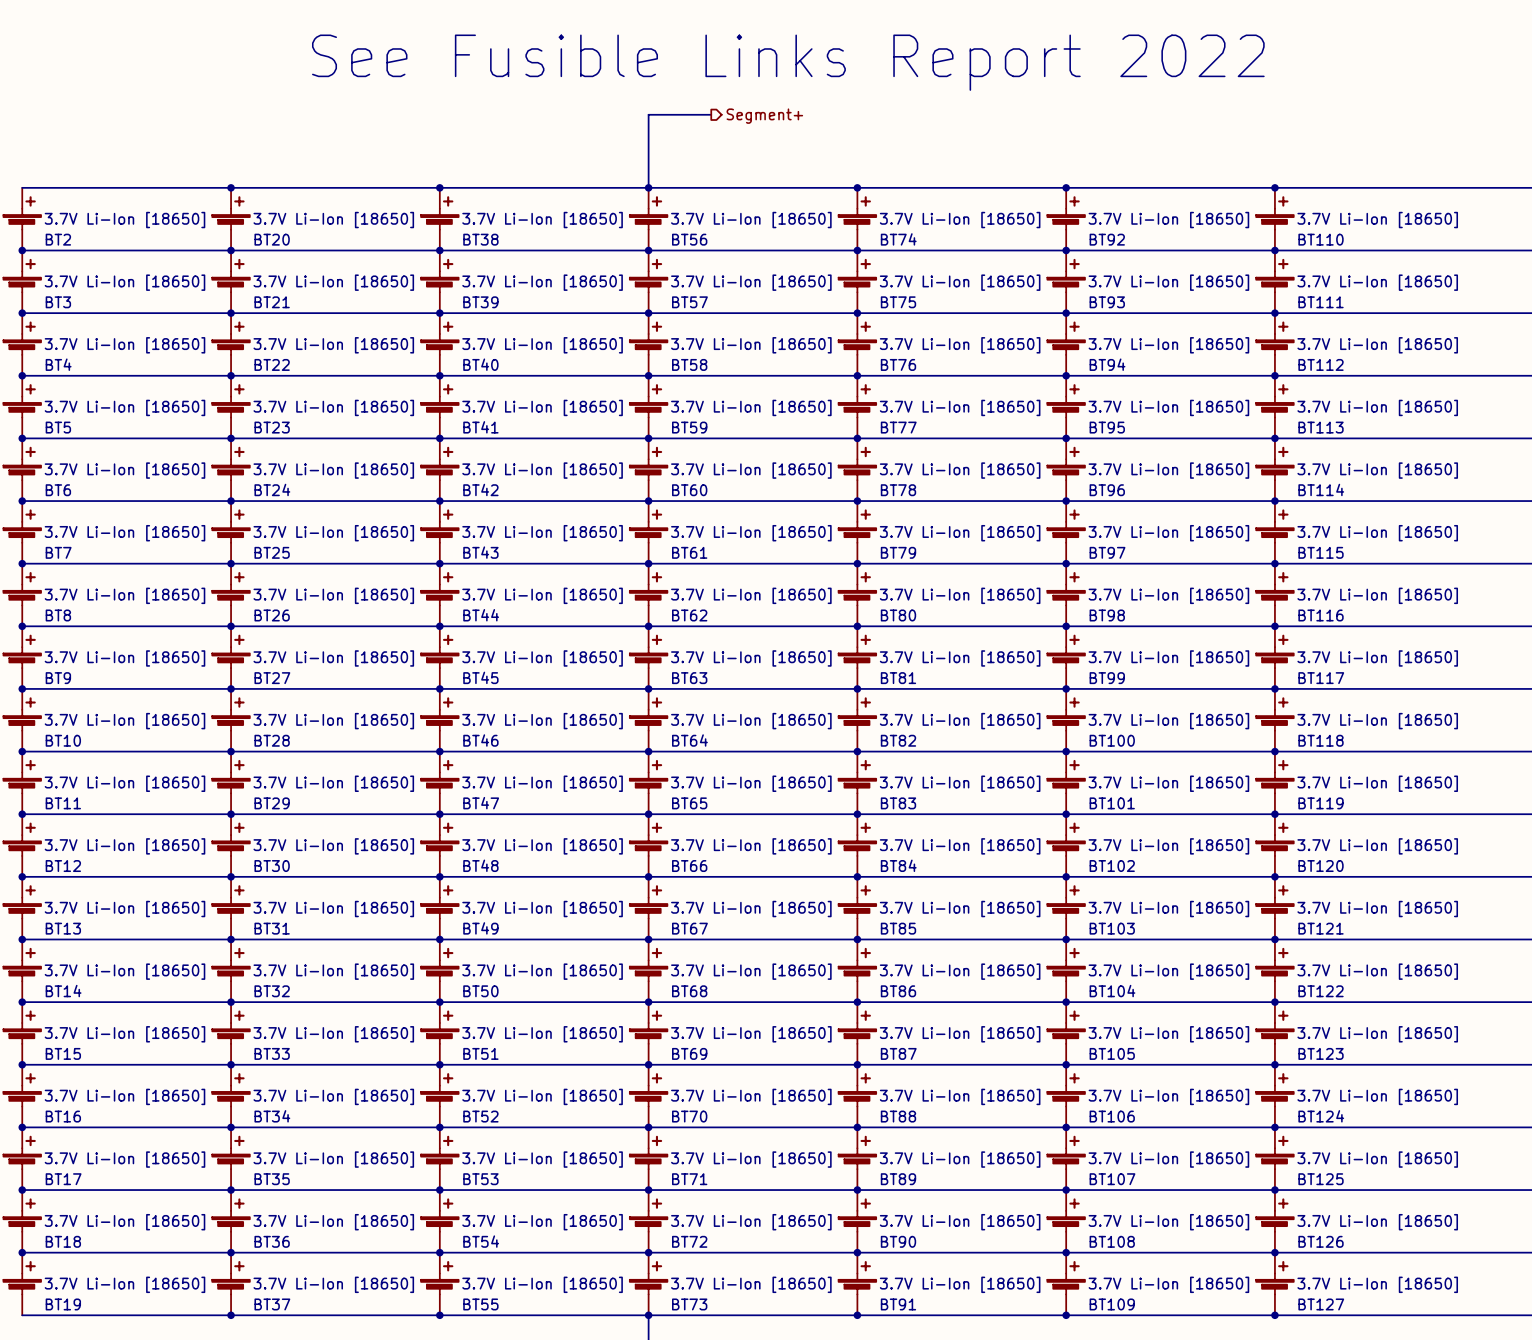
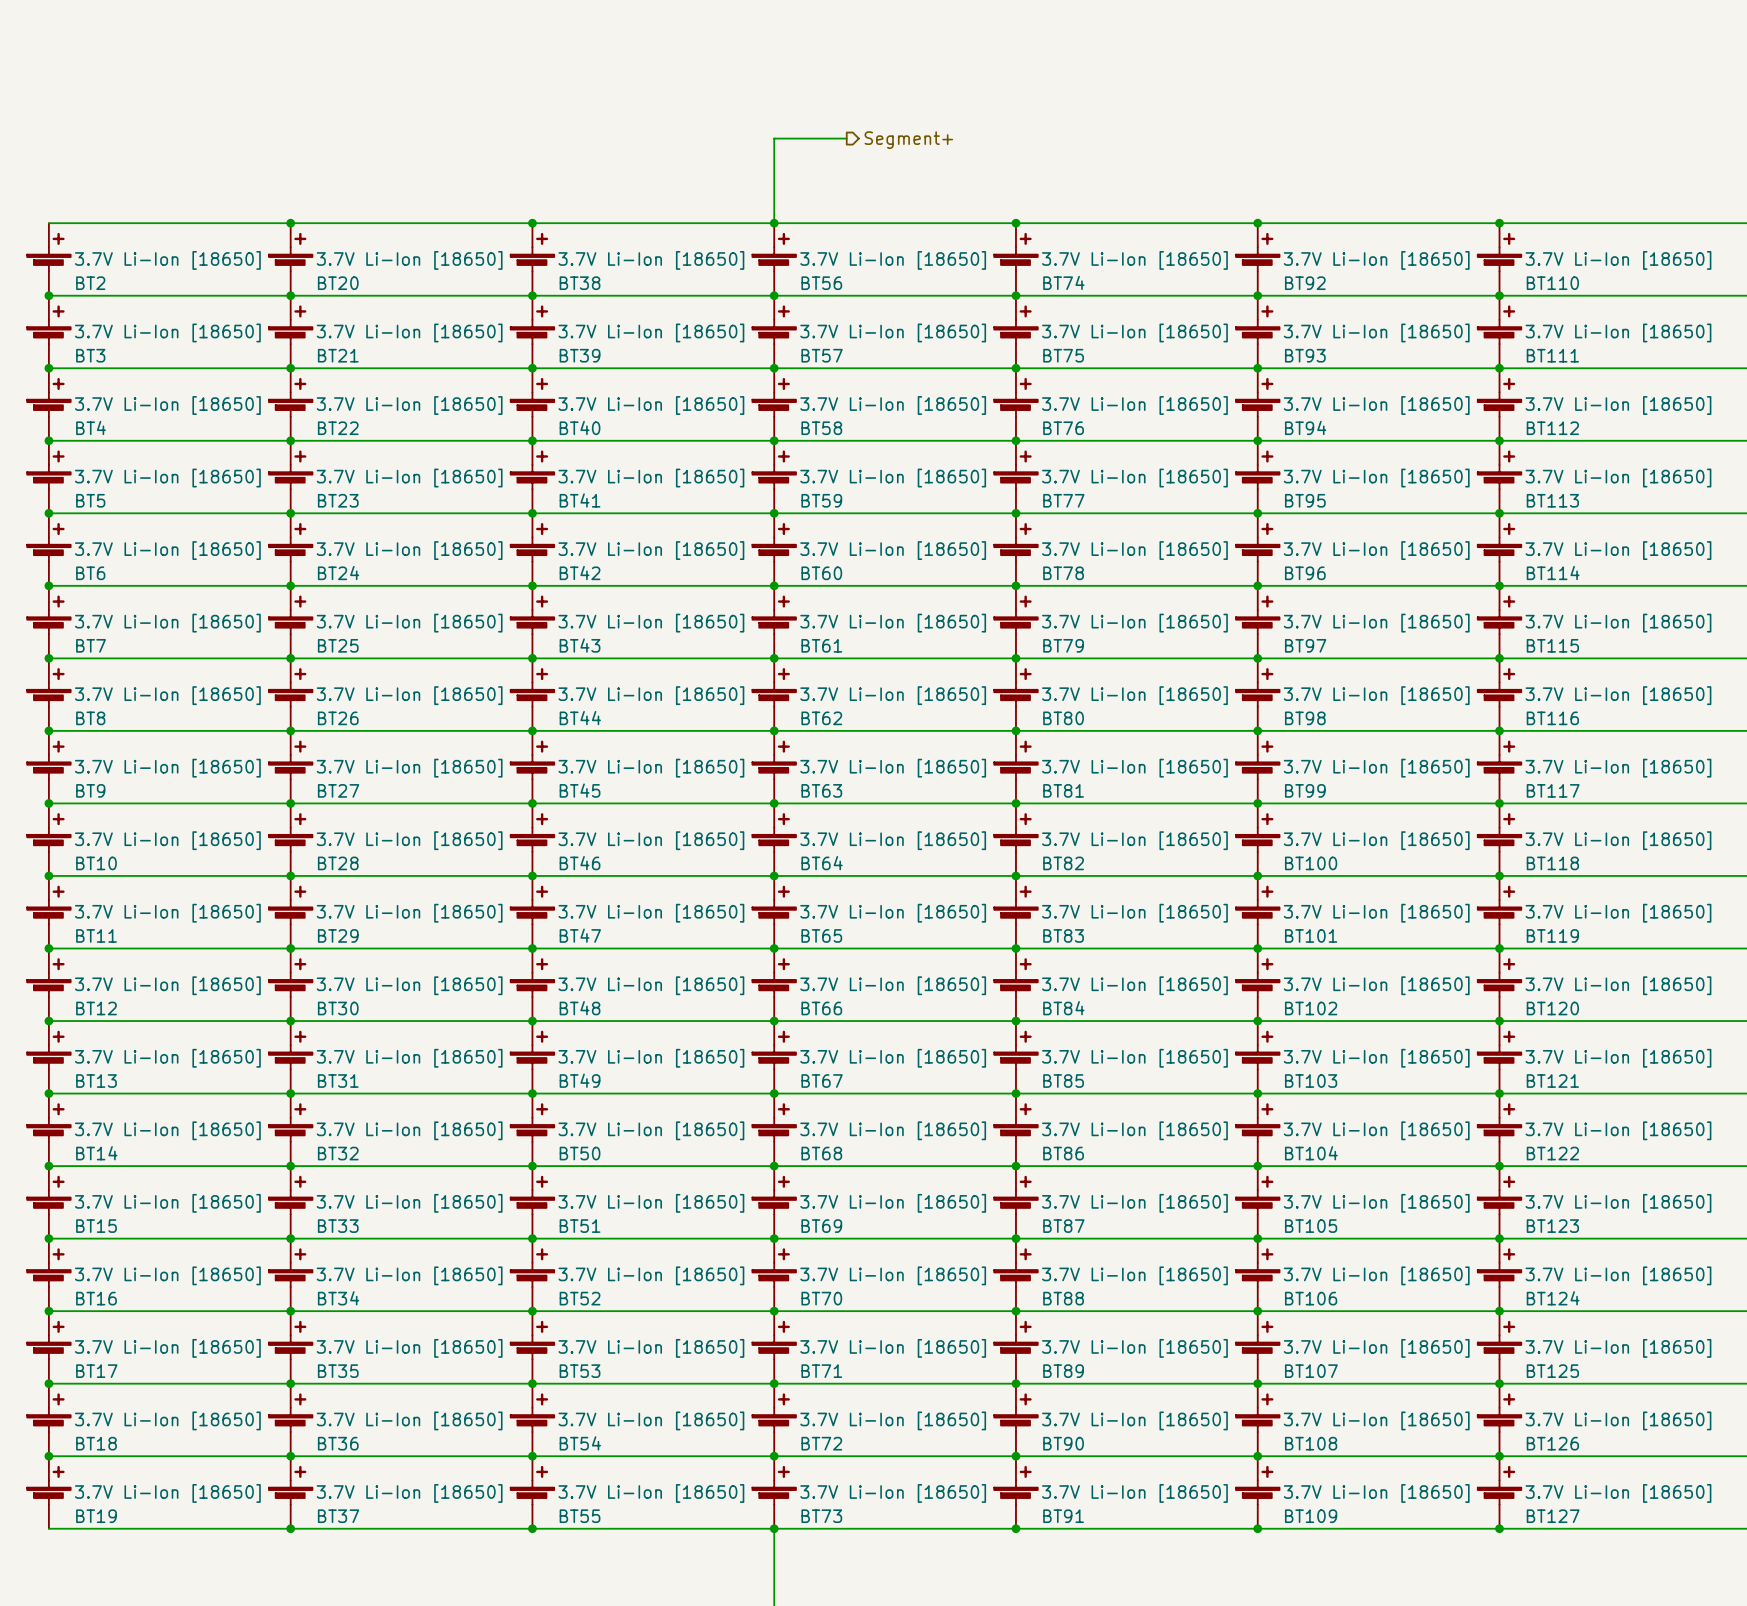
text: See Fusible Links Report 2022 (788, 62) -> none

